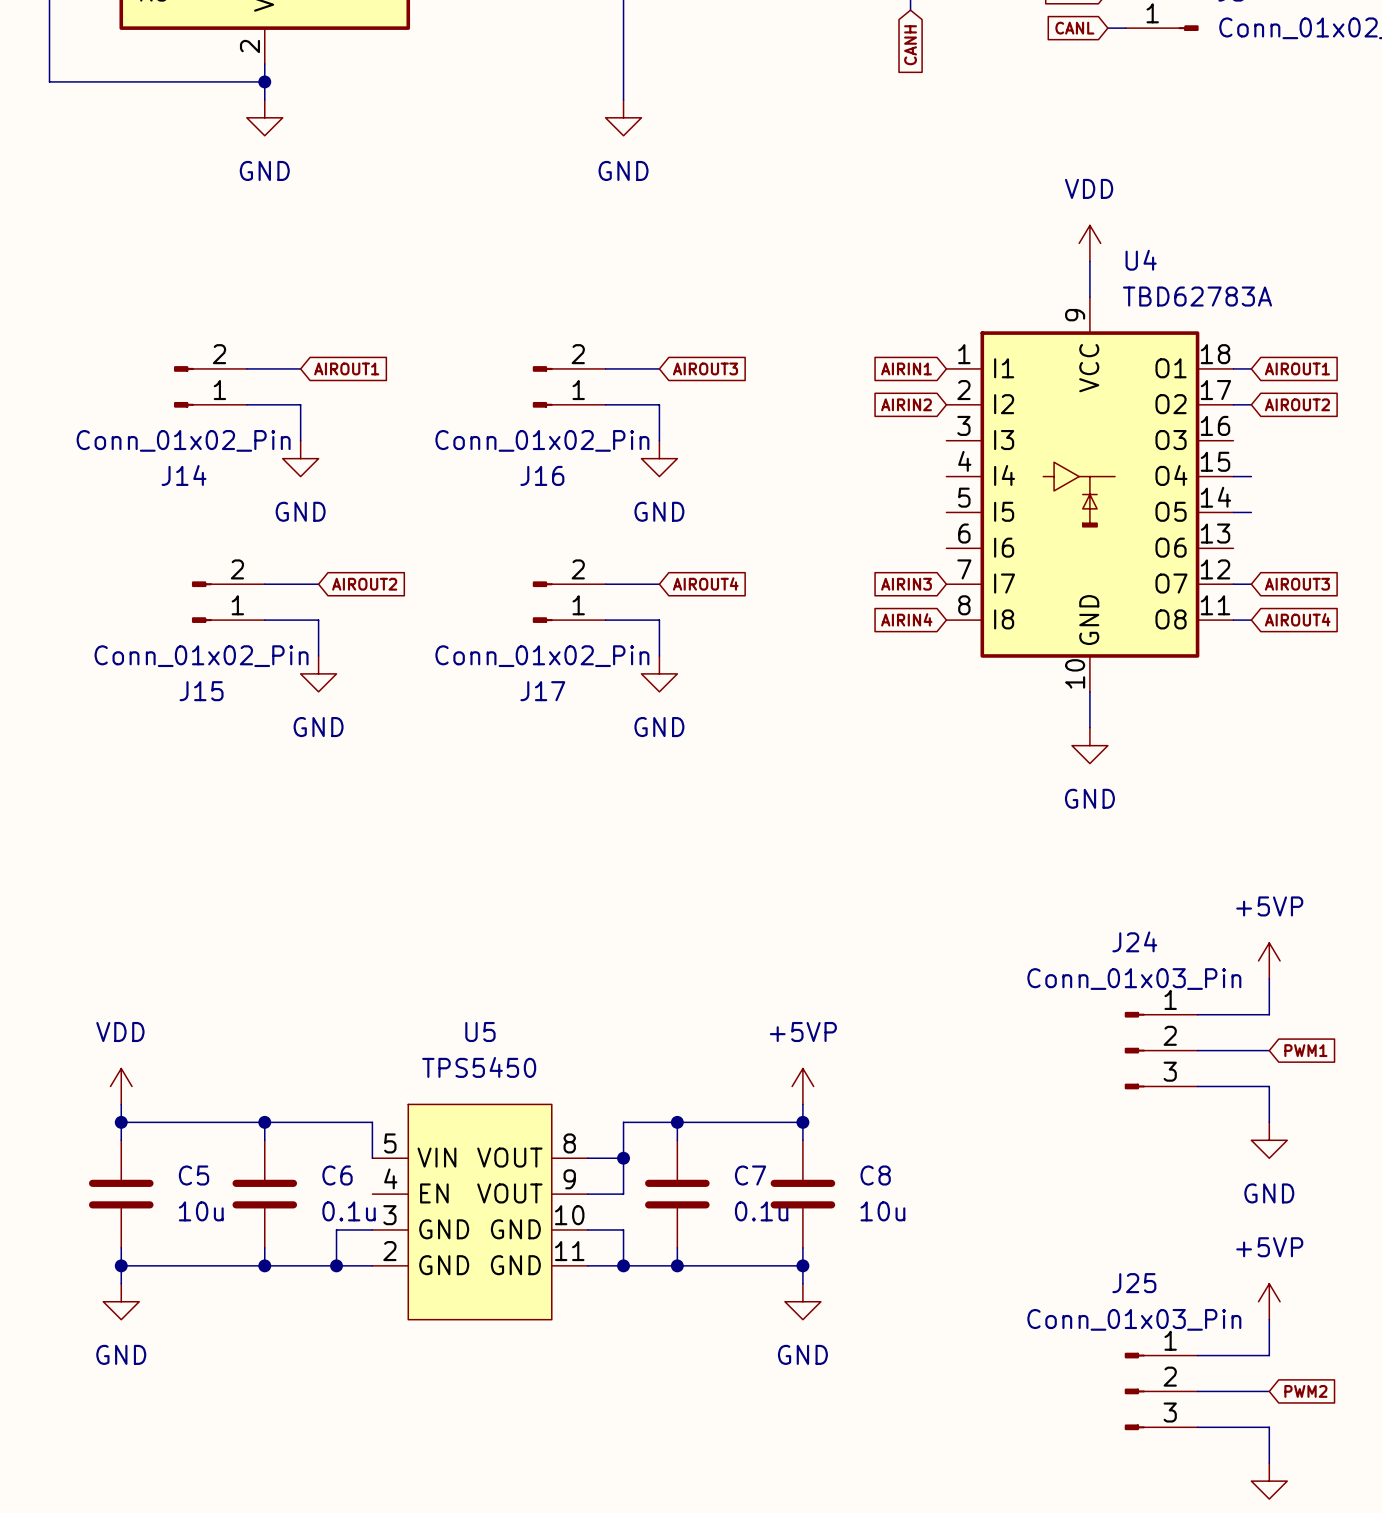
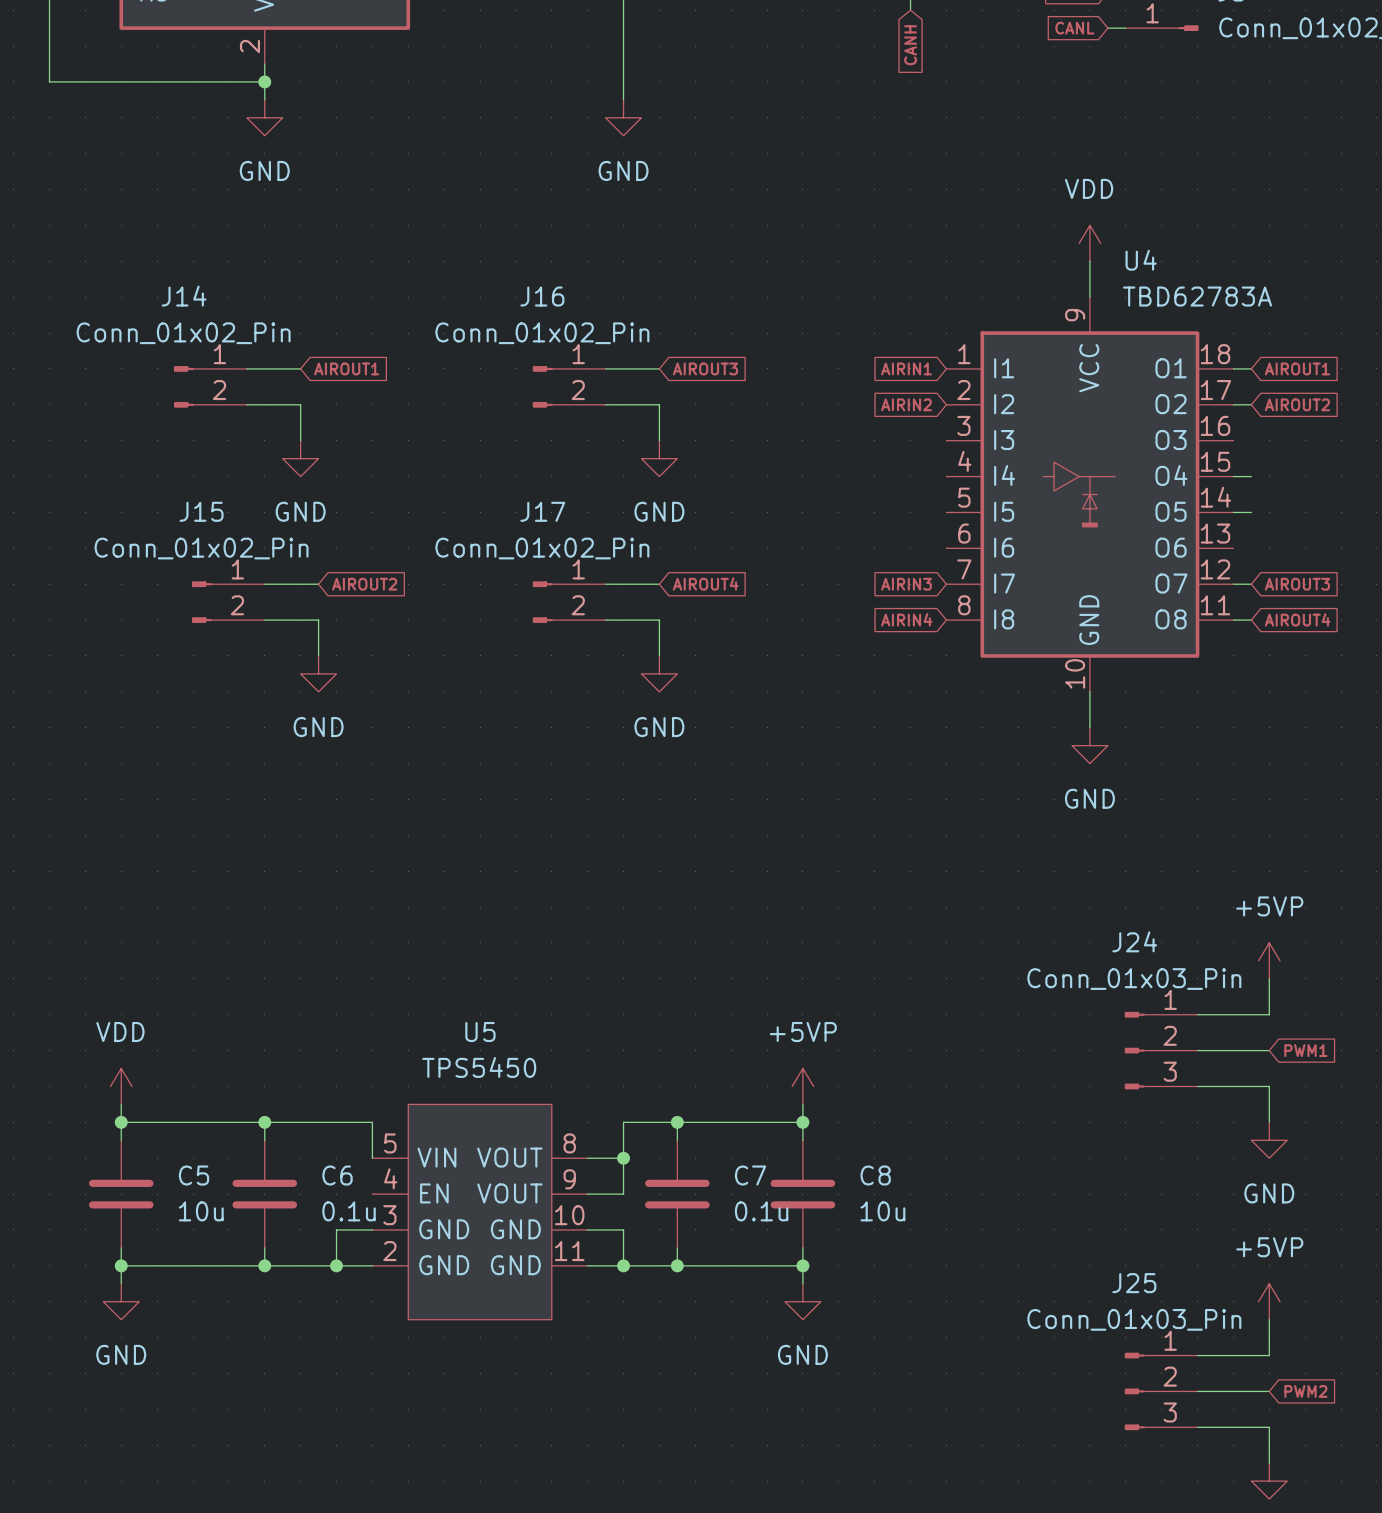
J14 flip: as is (184, 386) -> up-down (184, 386)
J16 flip: as is (542, 386) -> up-down (542, 386)
J15 flip: as is (201, 602) -> up-down (201, 602)
J17 flip: as is (542, 602) -> up-down (542, 602)

